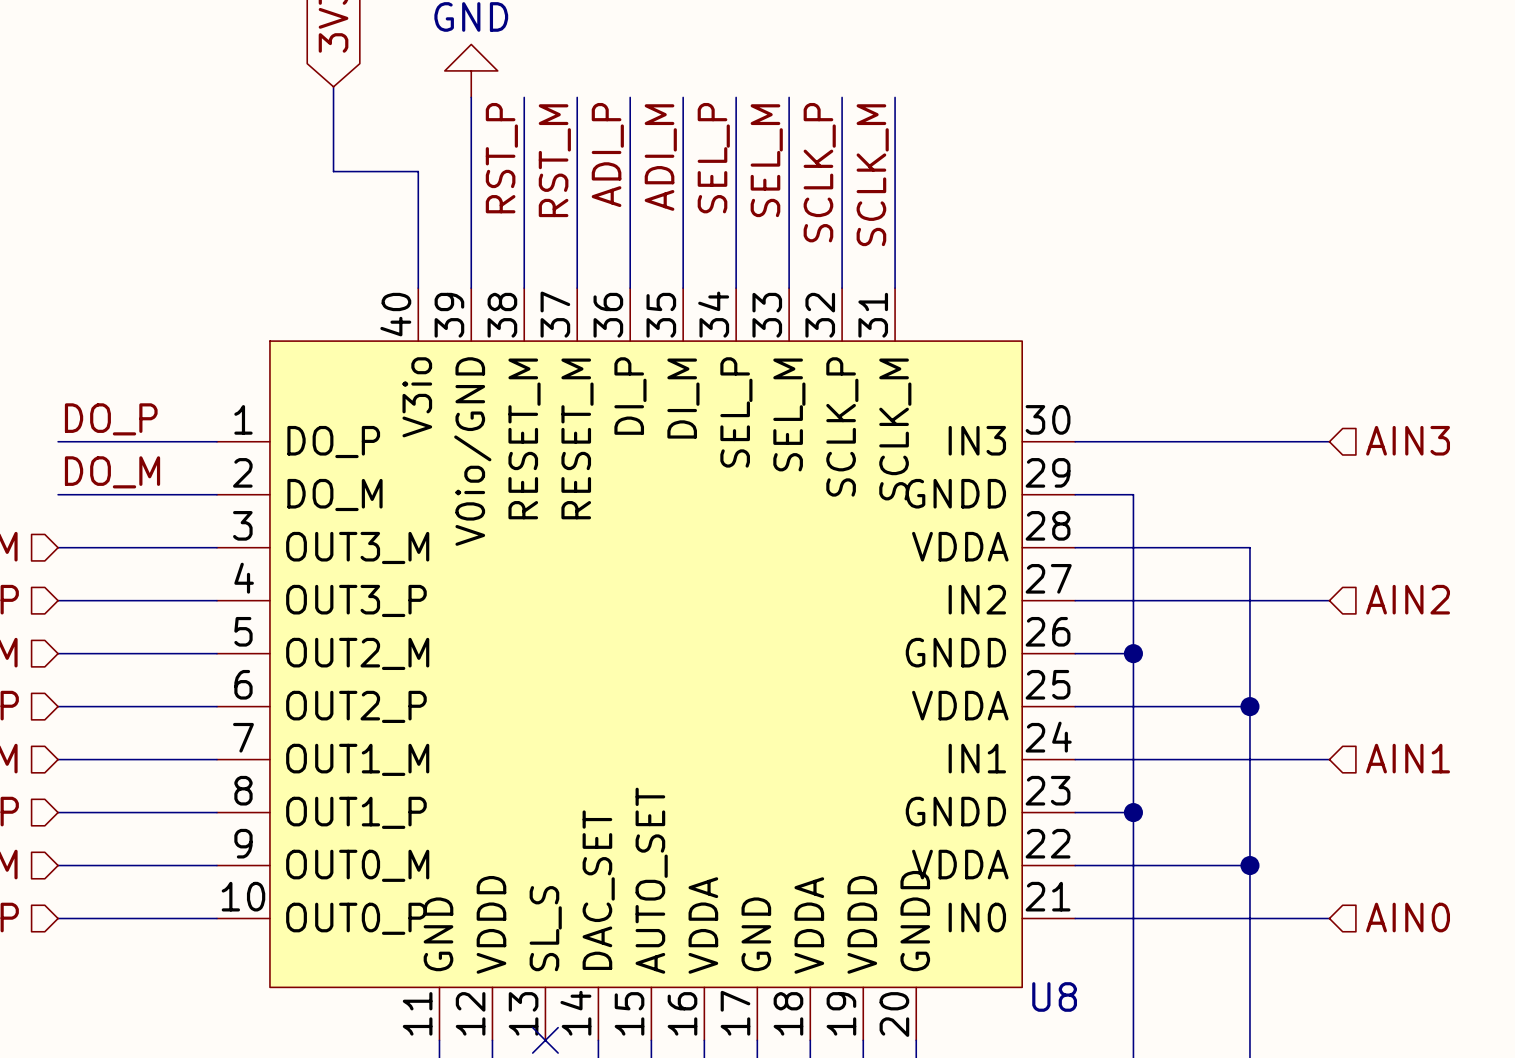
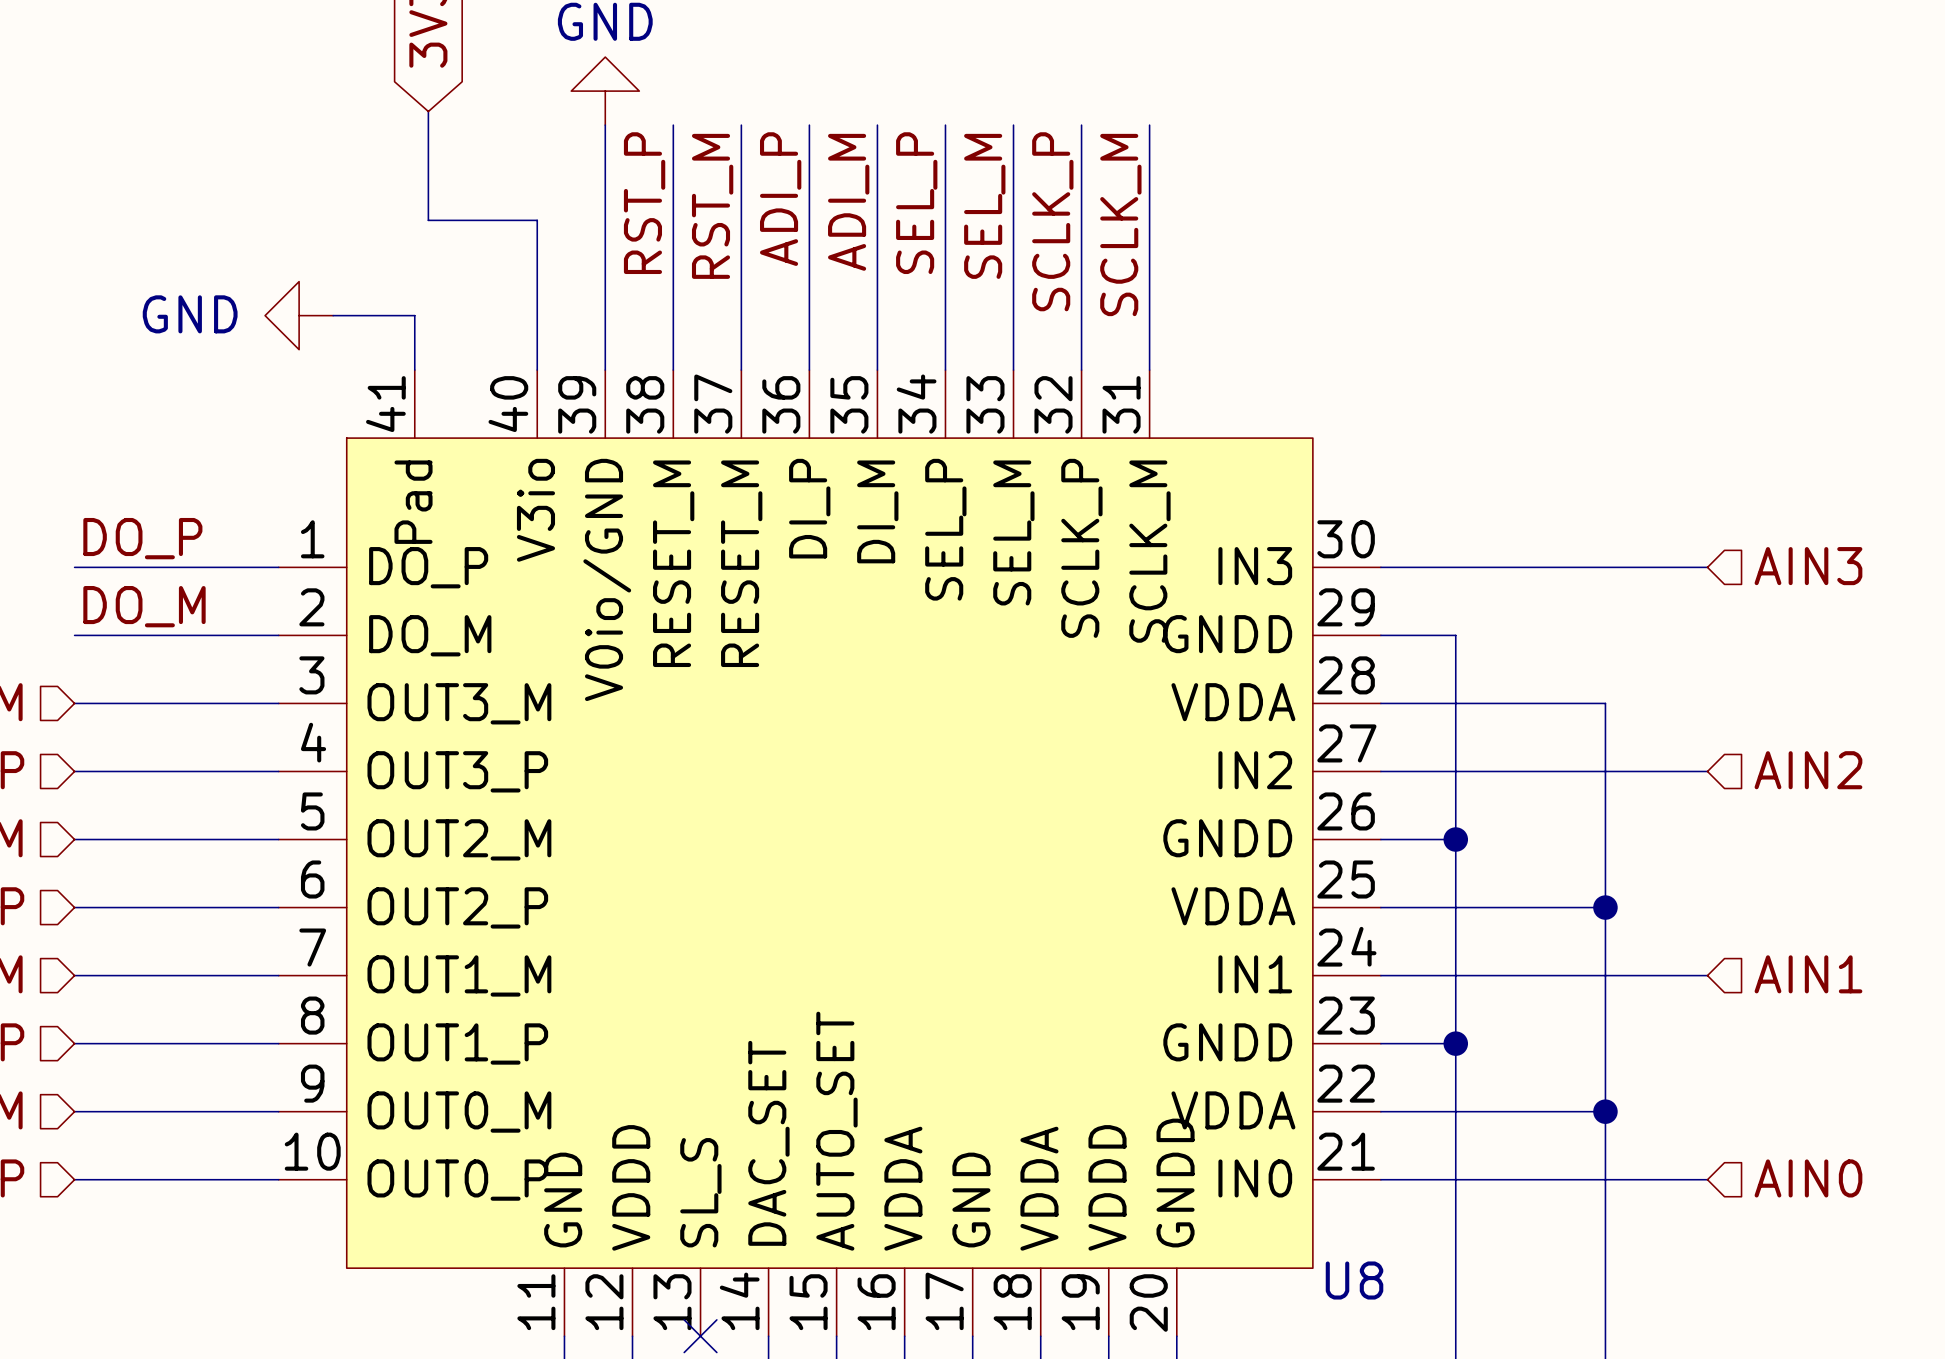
power symbol: none -> GND (299, 315)
wire: none -> (333, 315) (414, 315) (414, 370)
U8 symbol: [216, 288, 1076, 1041] -> [278, 370, 1381, 1337]

